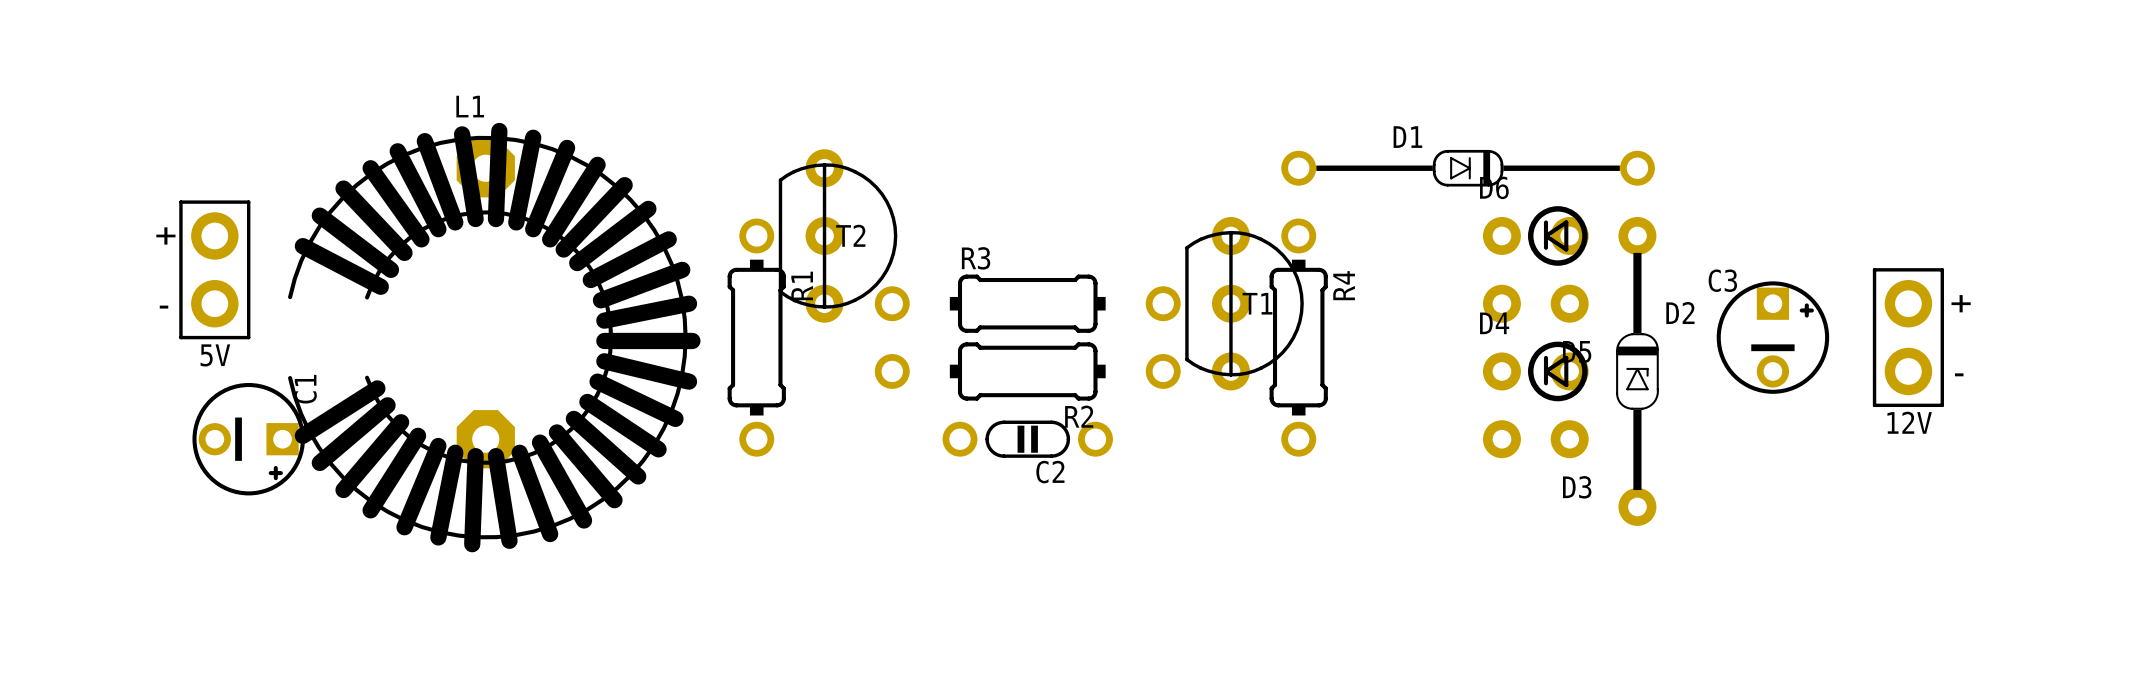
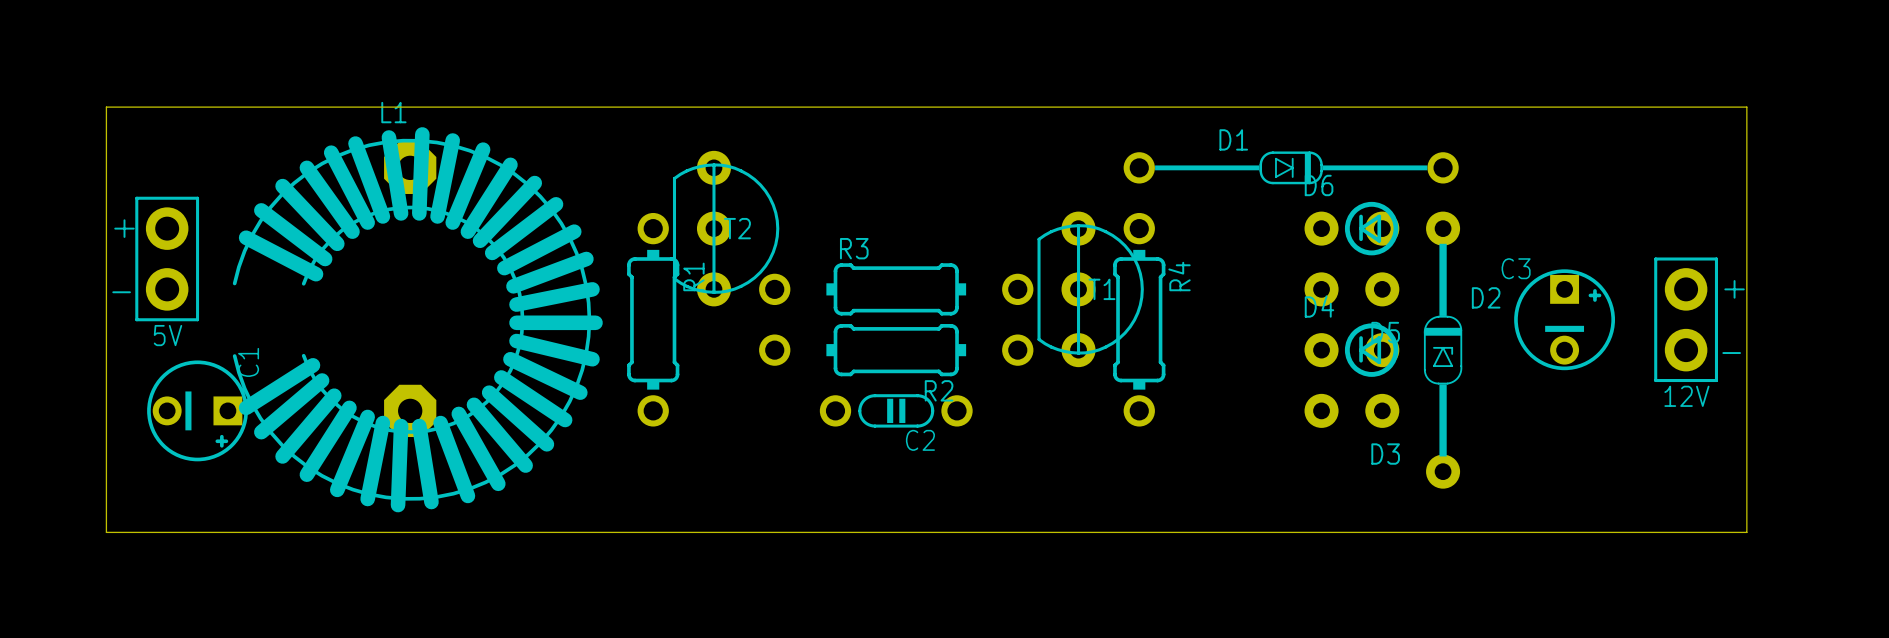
board edge: none -> (106, 107) (1746, 107) (1746, 532) (106, 532) (106, 107)

